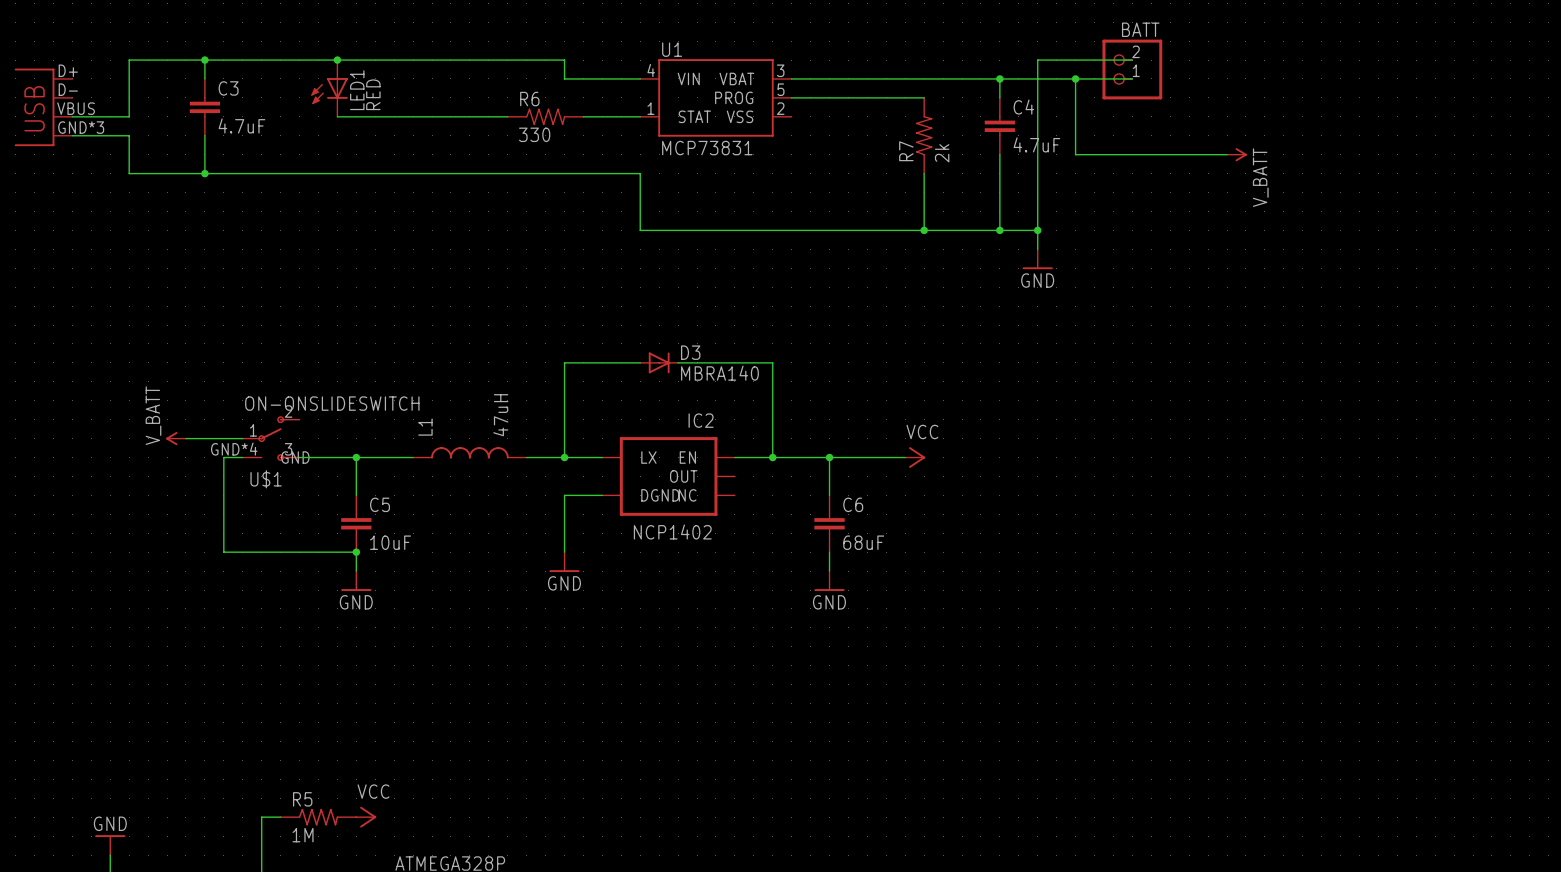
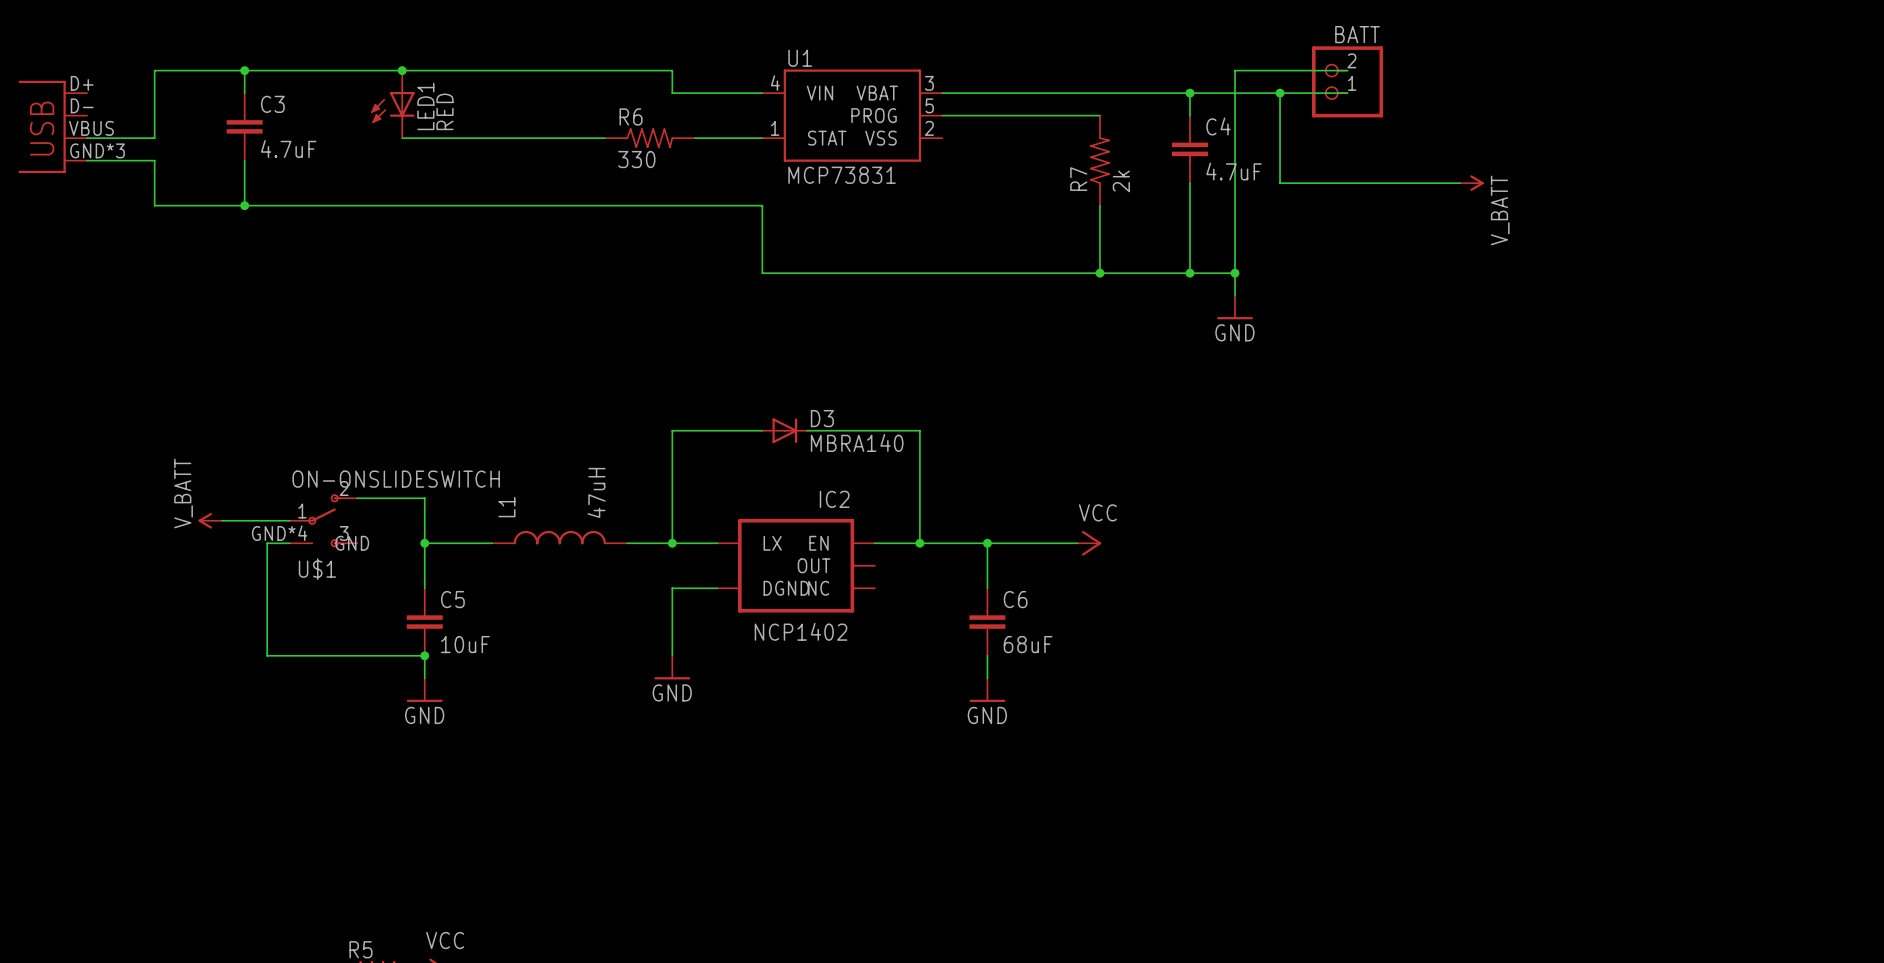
wire: (299, 457) (356, 457) -> (357, 498) (424, 498) (424, 543)

